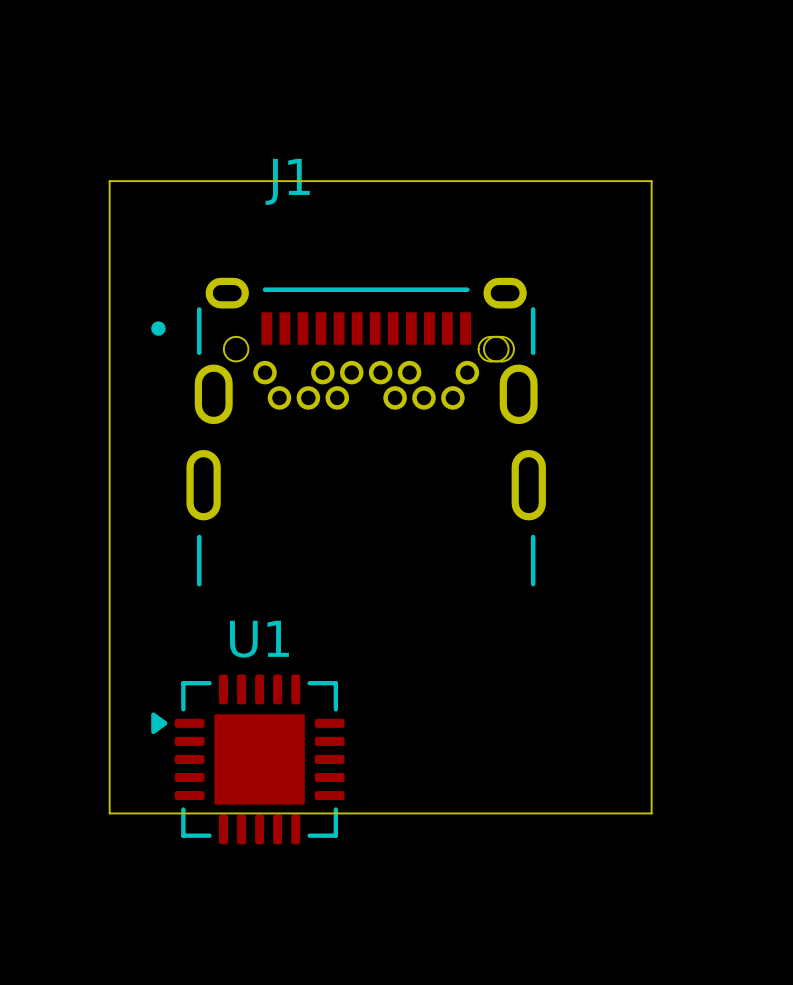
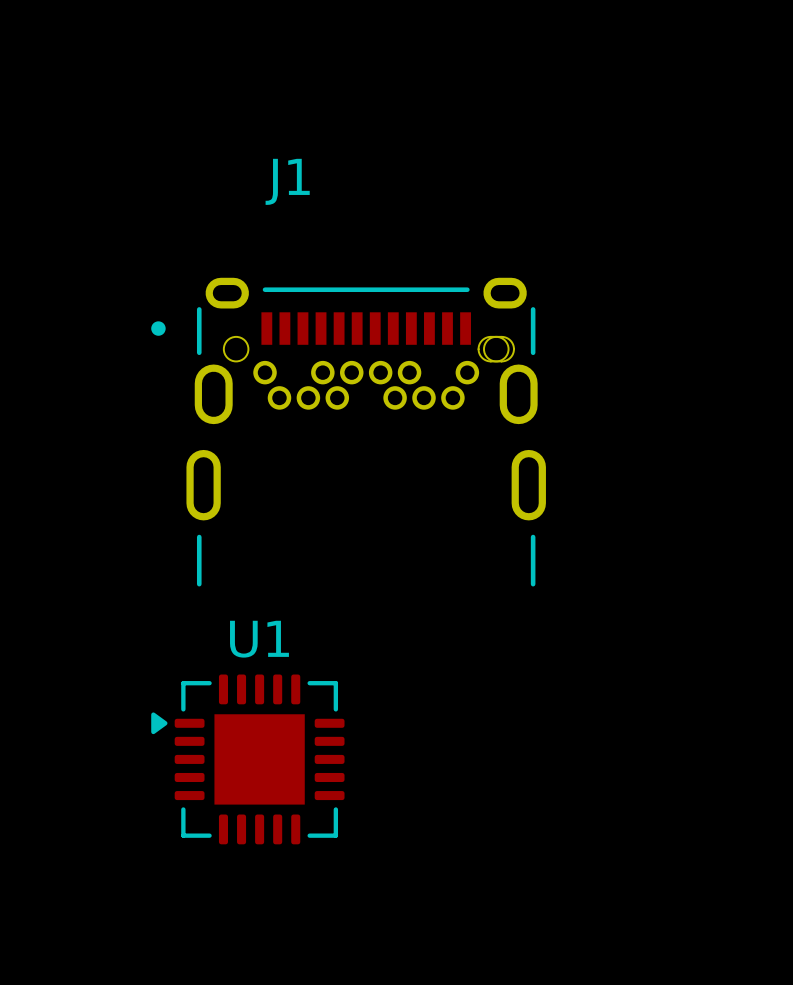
board edge: (109, 181) (651, 181) (651, 813) (109, 813) (109, 181) -> none

